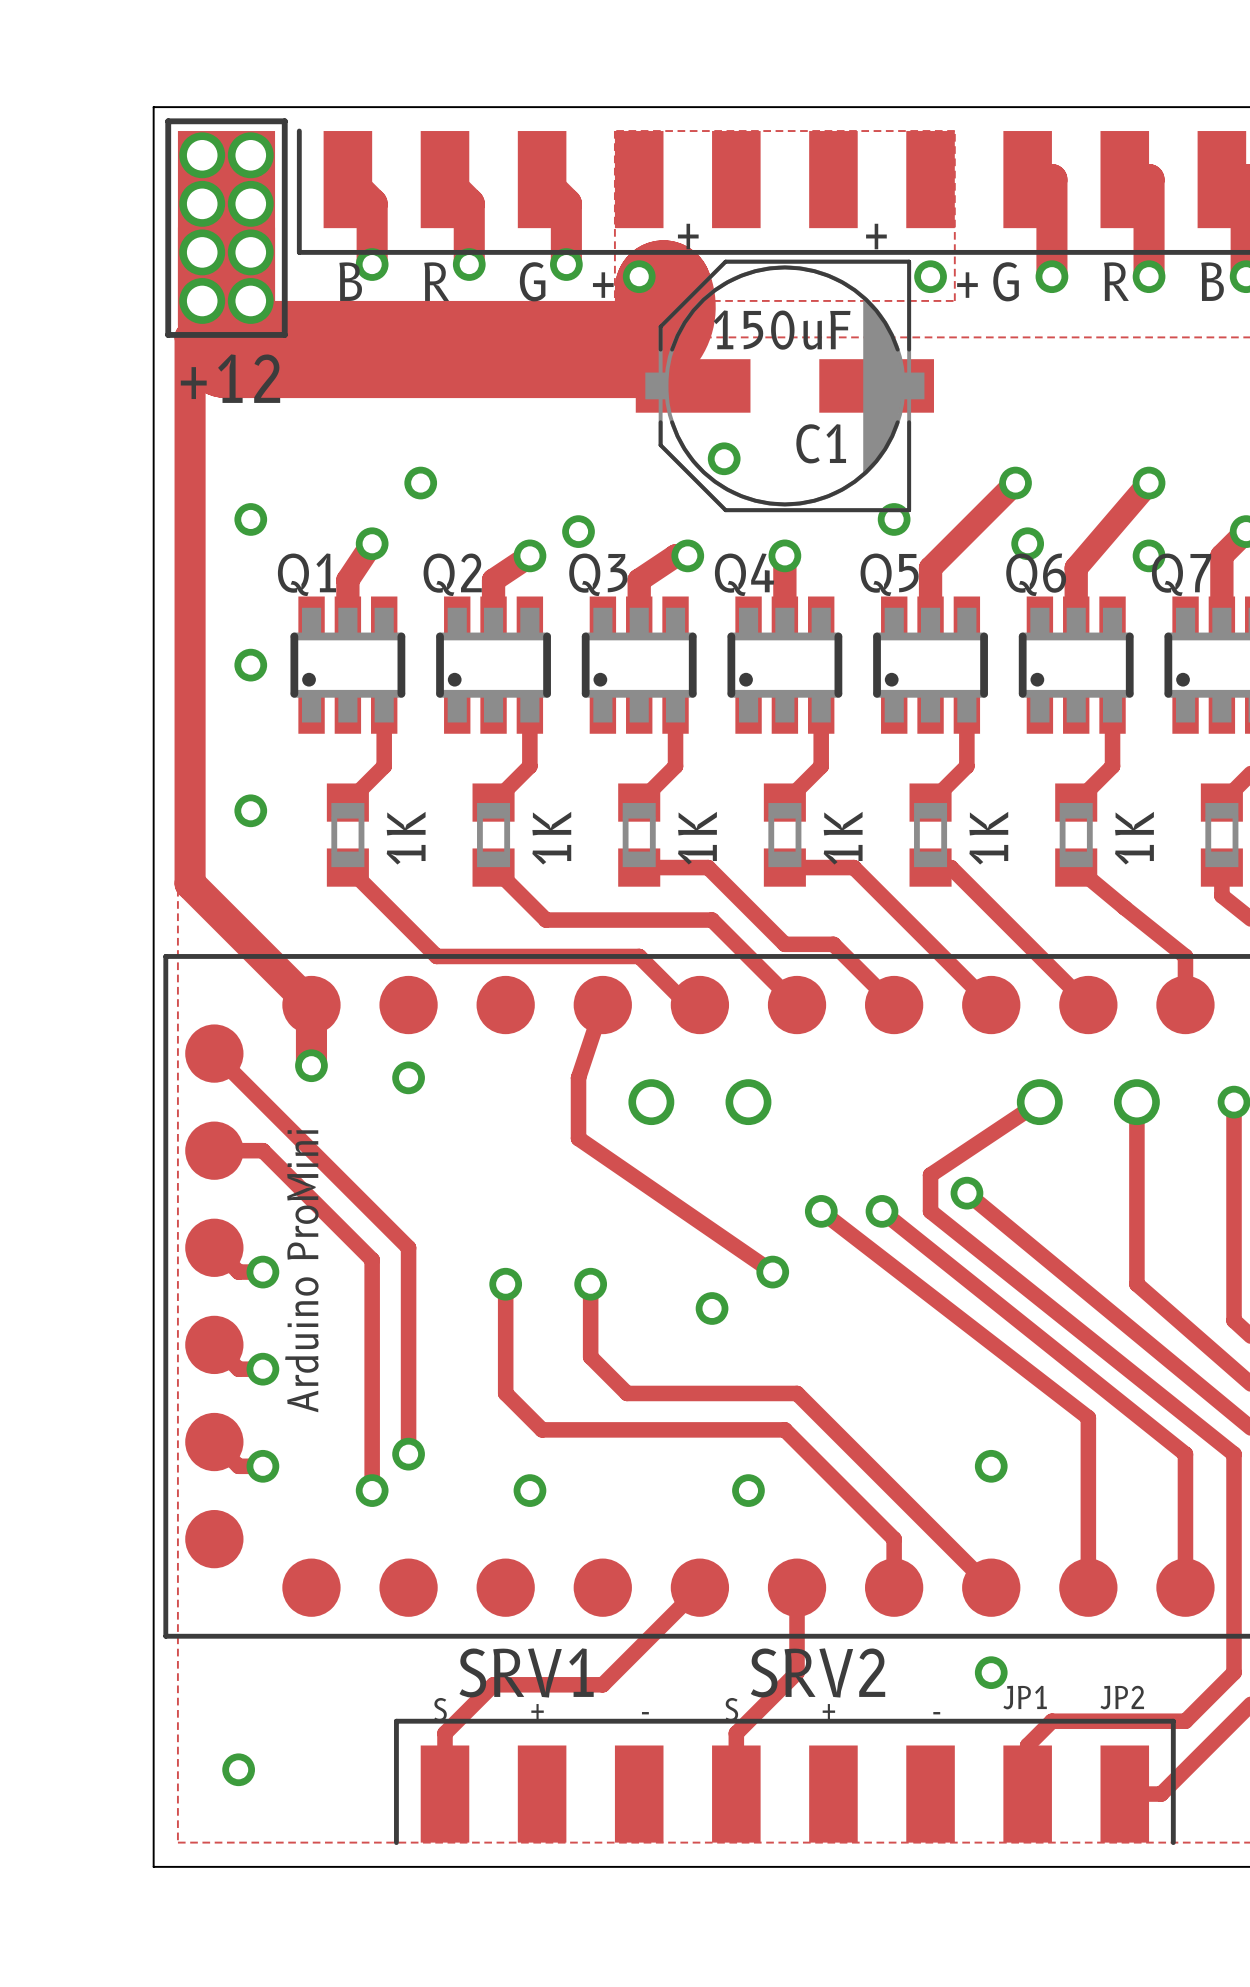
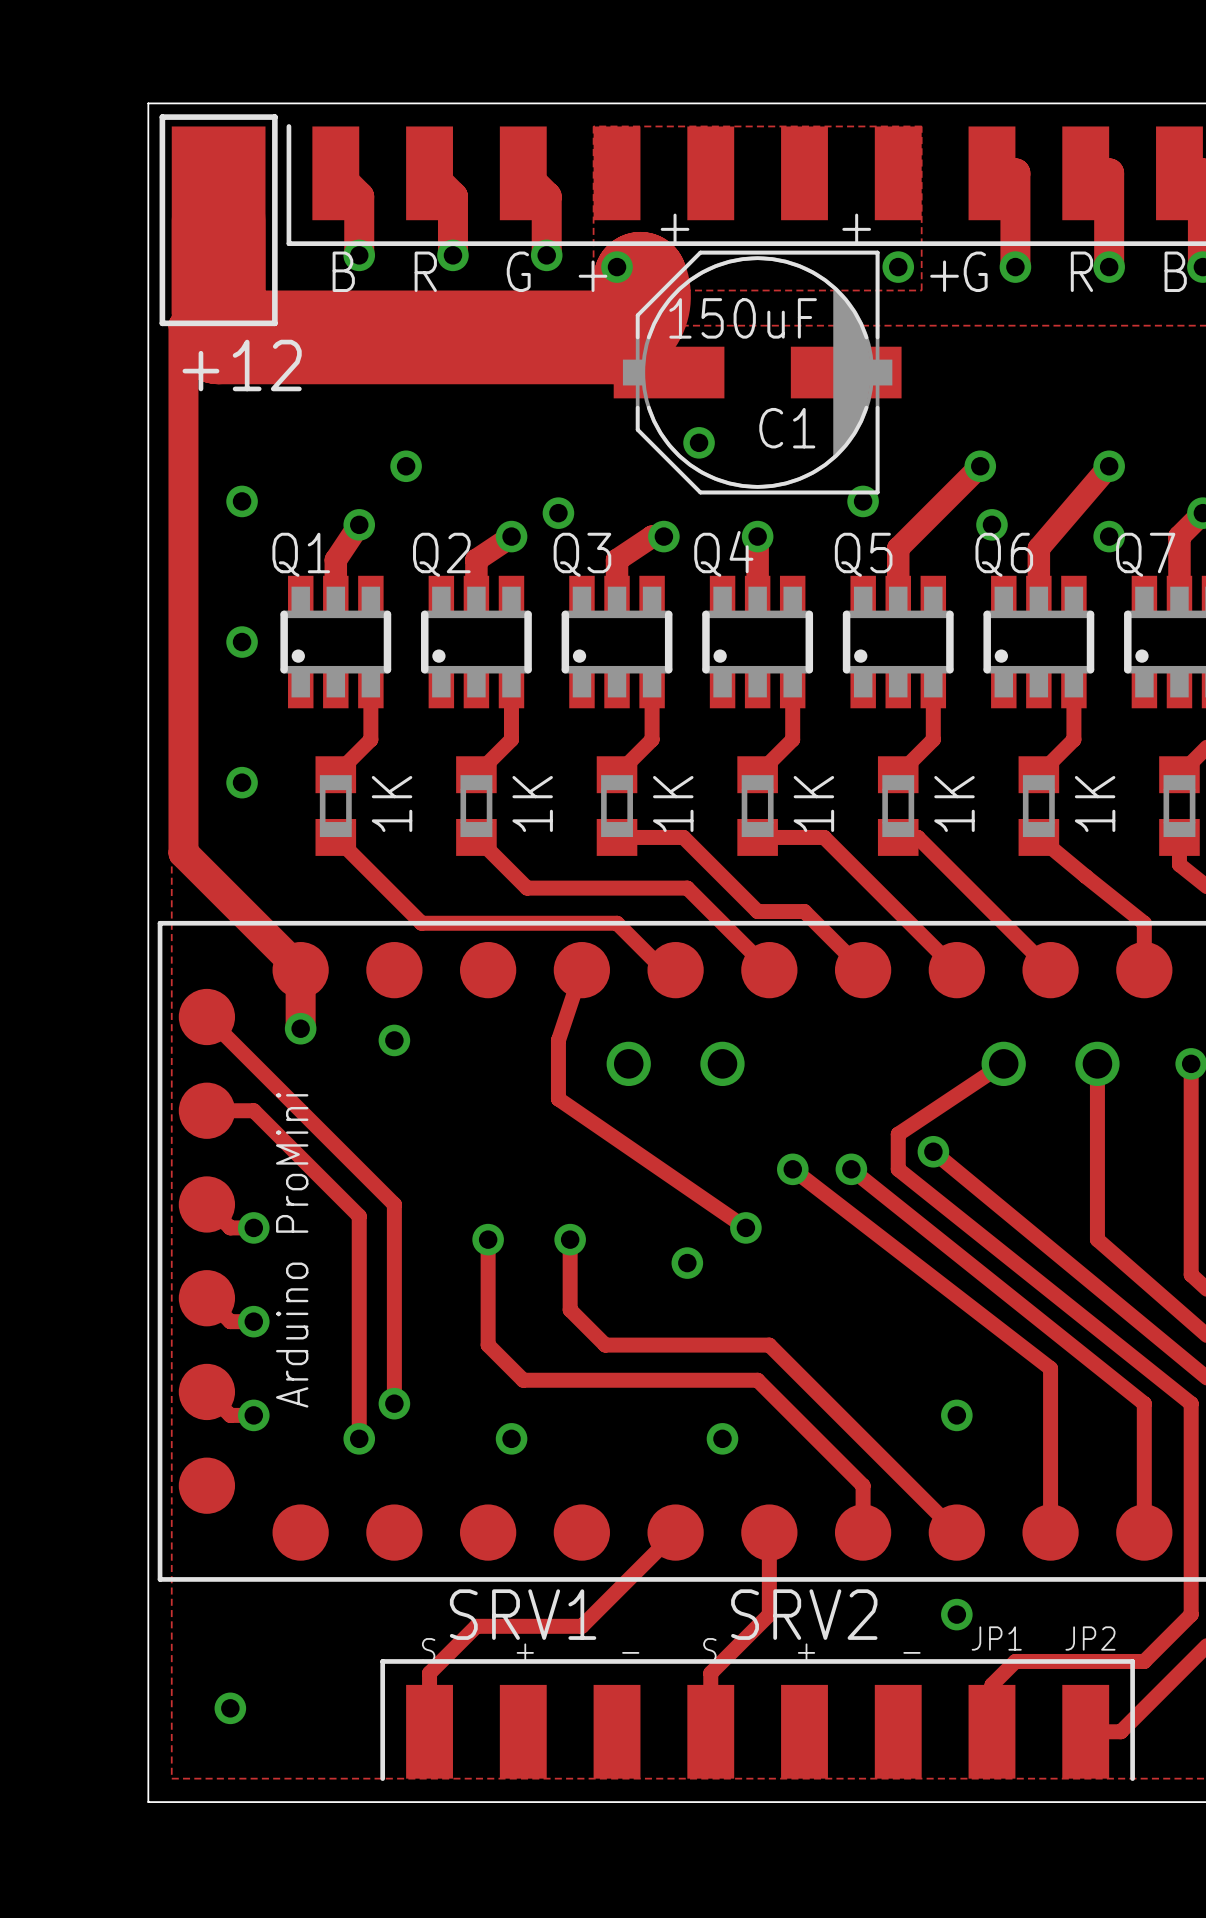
via: (202, 155) -> none
via: (250, 155) -> none
via: (202, 203) -> none
via: (250, 203) -> none
via: (202, 252) -> none
via: (250, 252) -> none
via: (202, 300) -> none
via: (250, 300) -> none

